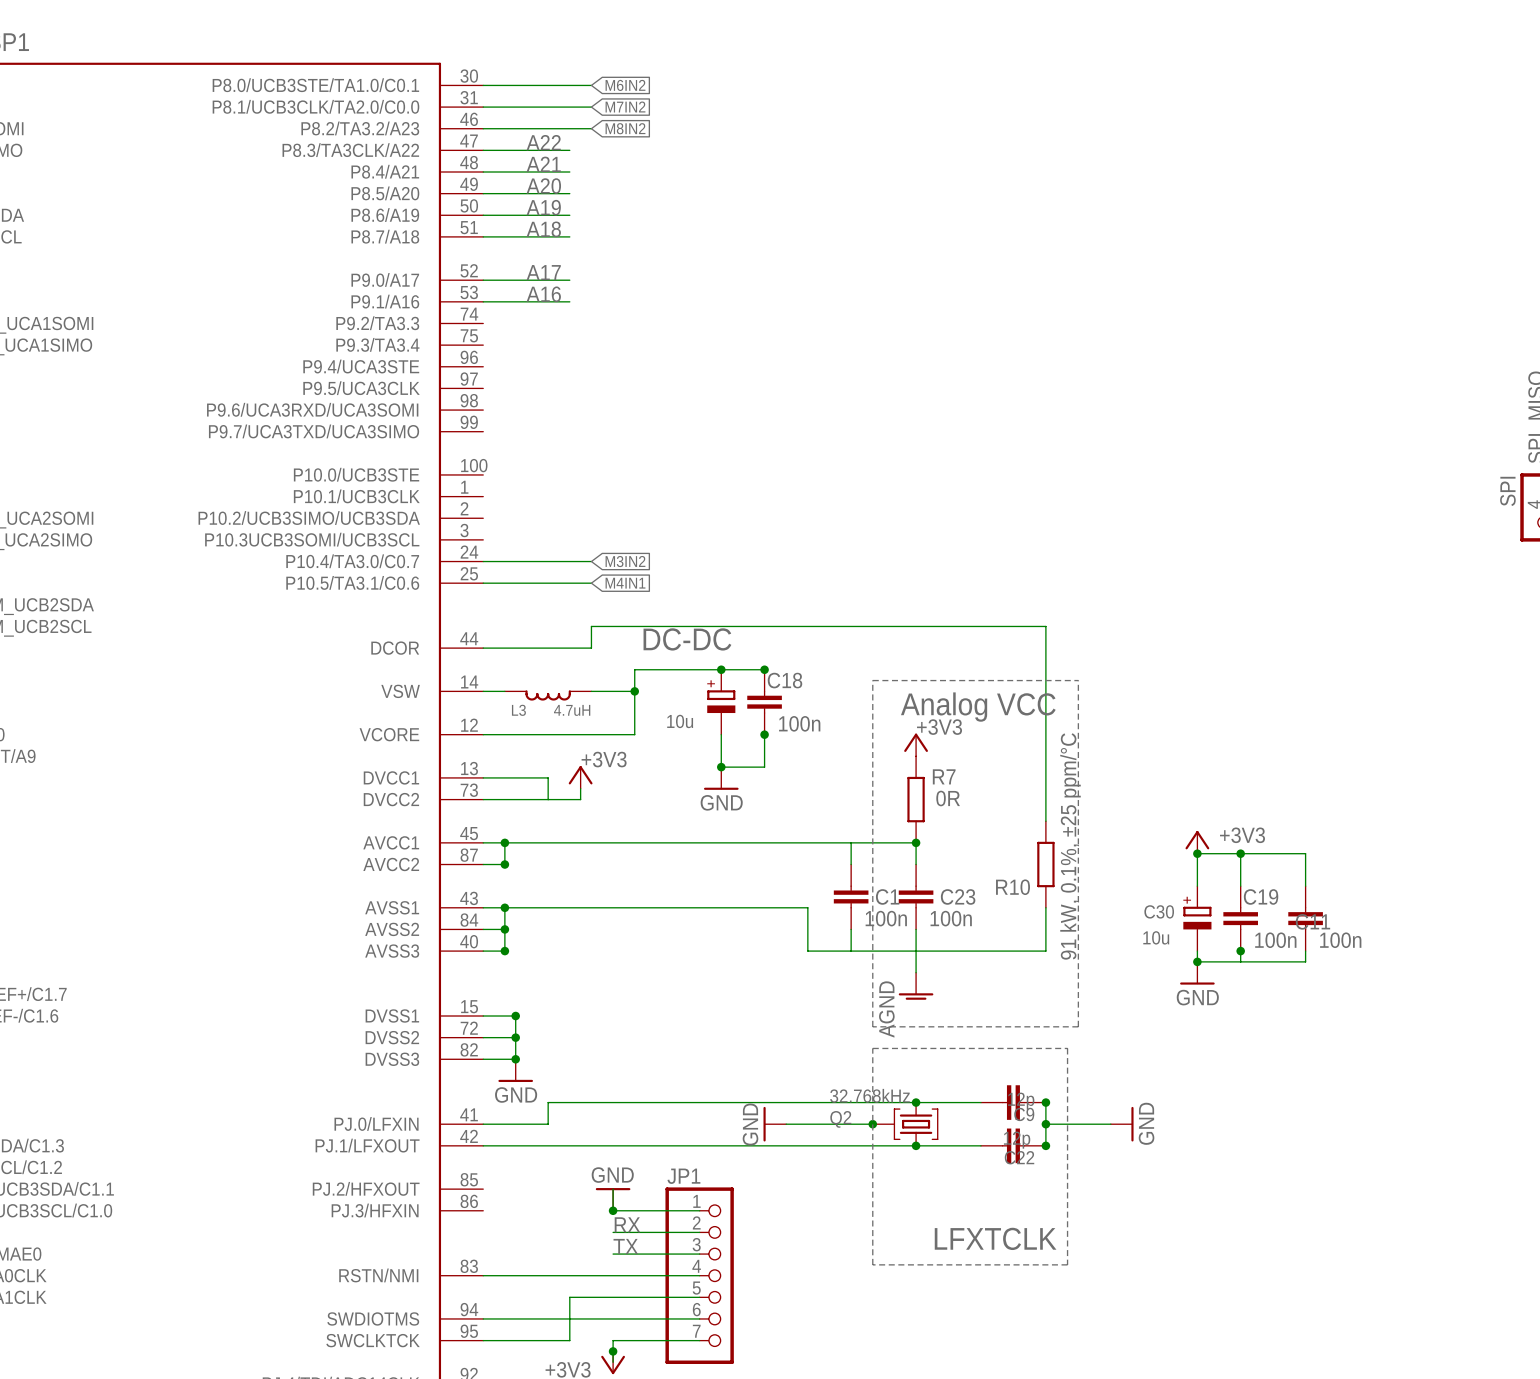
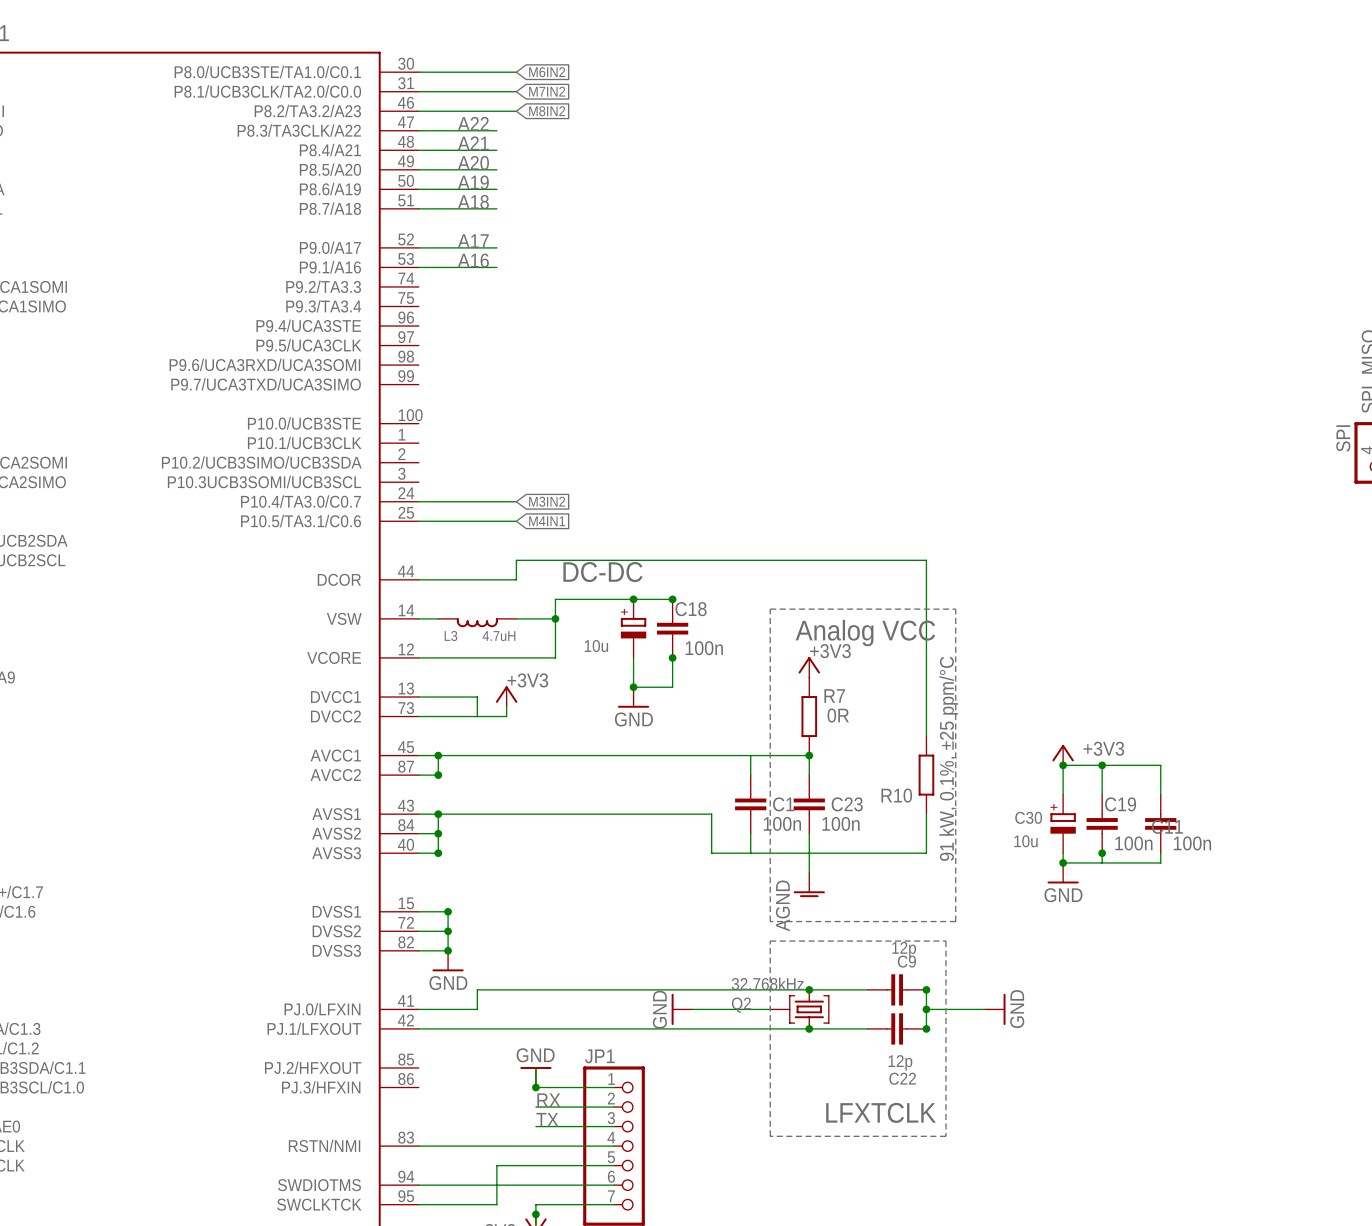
C9 value position: 12p (1021, 1101) -> 12p (900, 1062)
C9 name: C9 (1024, 1114) -> C22 (902, 1078)
junction: (872, 1124) -> none
C22 value position: 12p (1017, 1140) -> 12p (904, 949)
C22 name: C22 (1019, 1157) -> C9 (906, 961)

